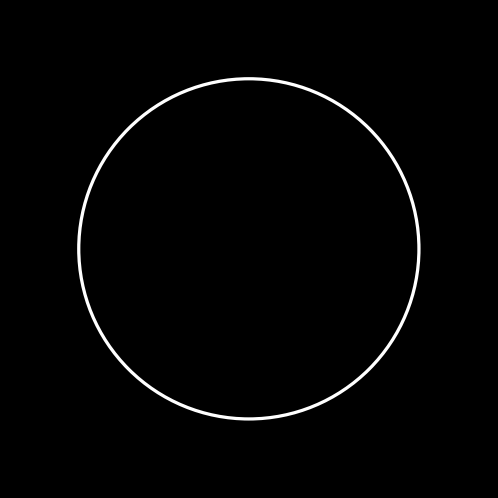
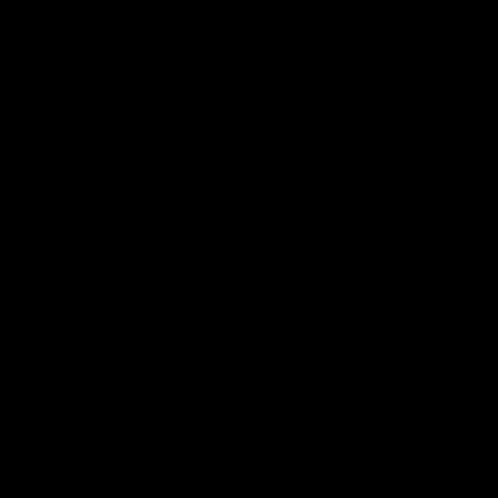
round board edge: [77, 77, 421, 421] -> none

